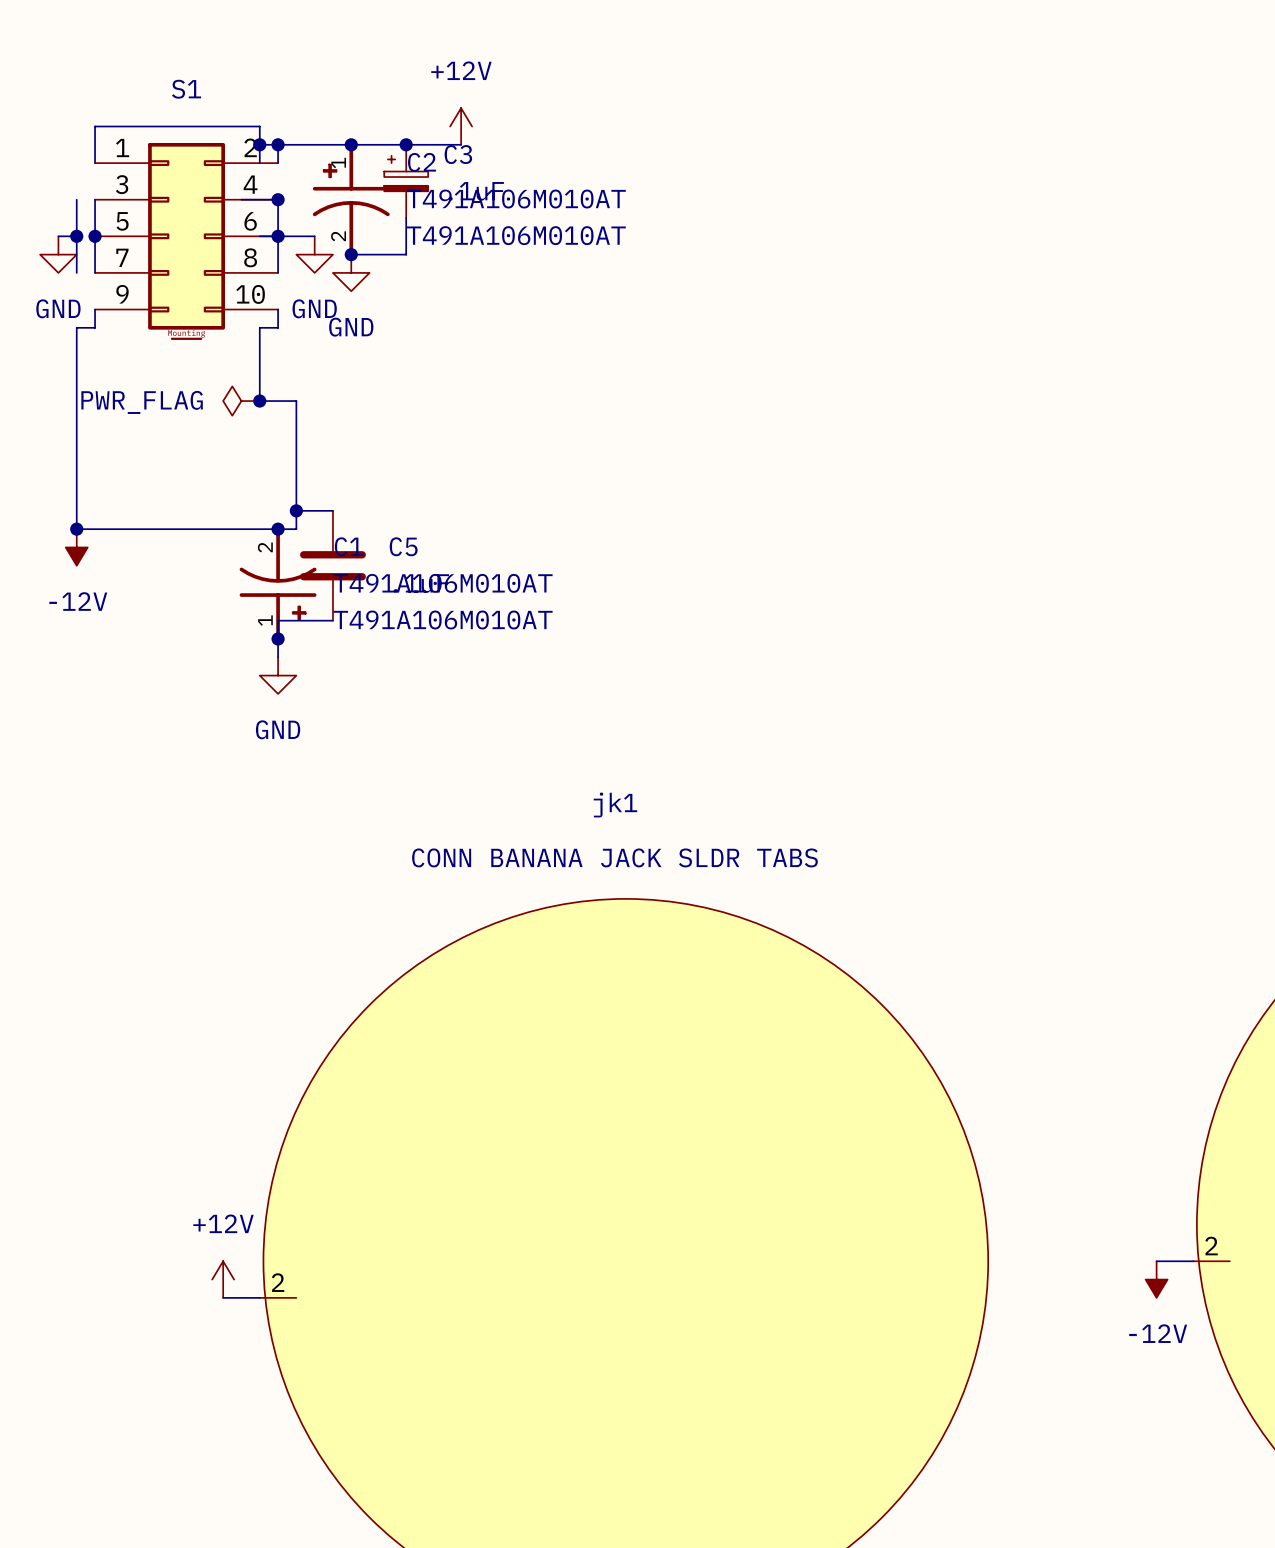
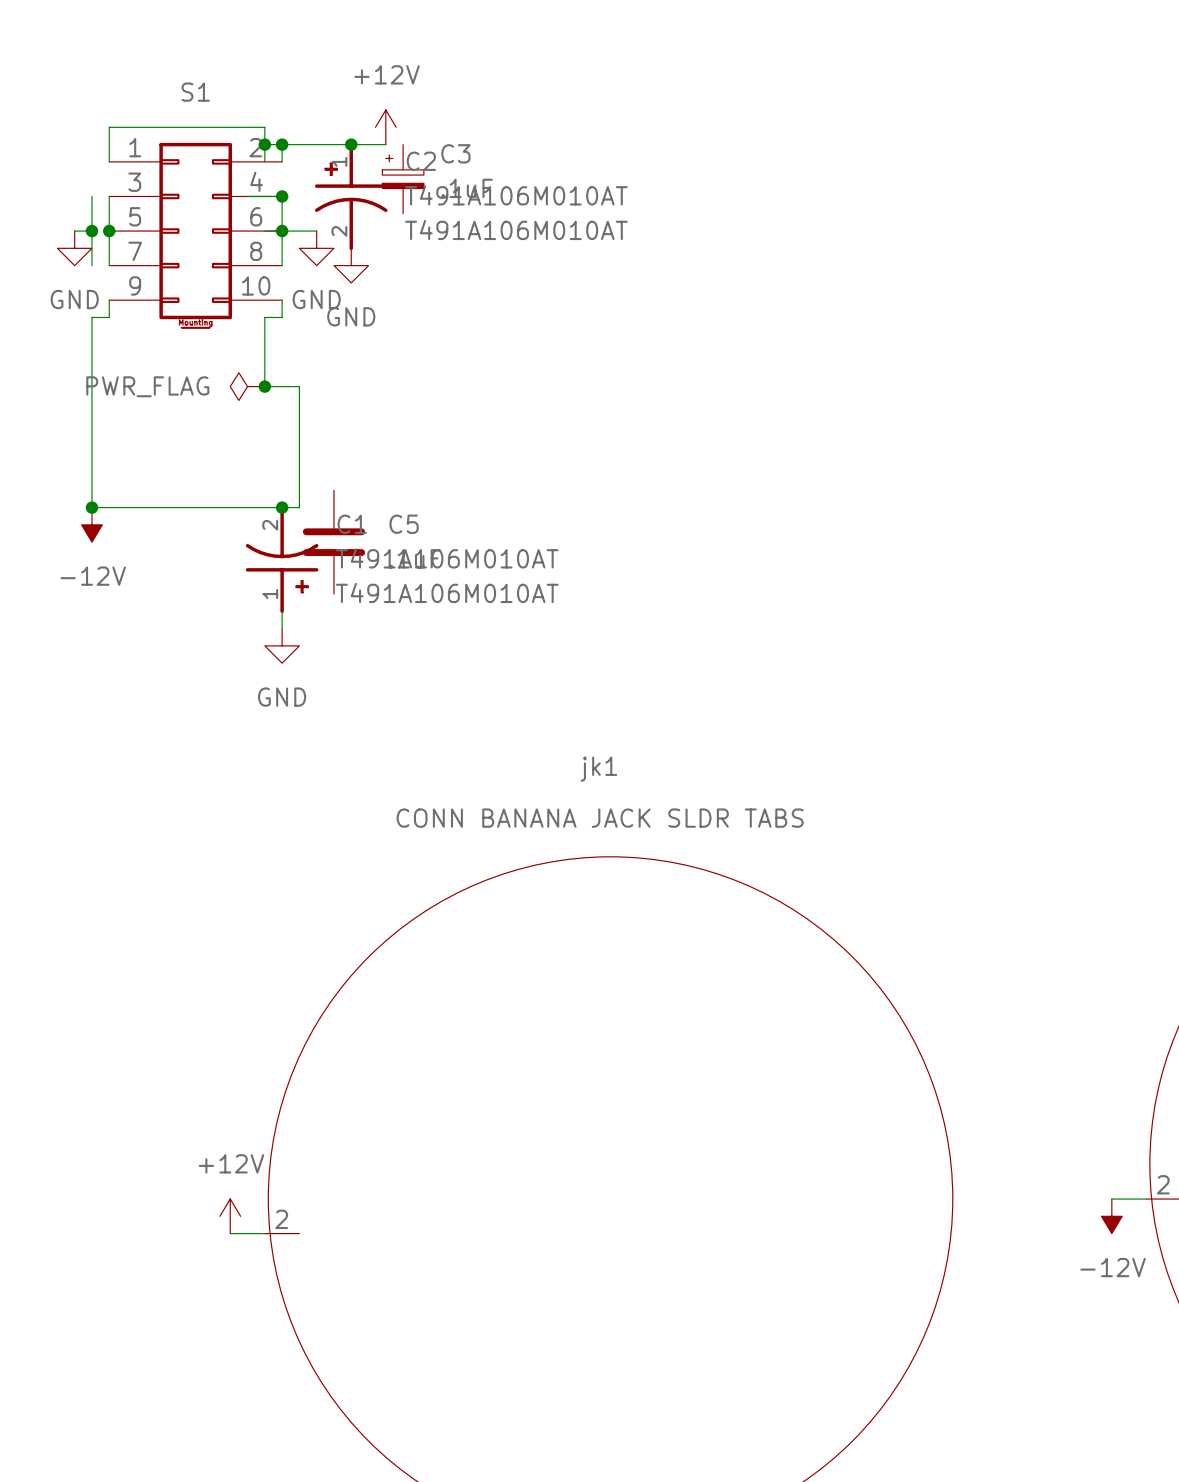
power symbol position: +12V (461, 126) -> +12V (385, 127)
wire: (387, 144) (461, 144) -> none
junction: (406, 144) -> none
wire: (406, 218) (406, 254) (351, 254) -> none
junction: (351, 254) -> none
wire: (296, 510) (332, 510) -> none
junction: (296, 510) -> none
wire: (332, 620) (278, 620) (278, 638) -> none
junction: (278, 638) -> none

